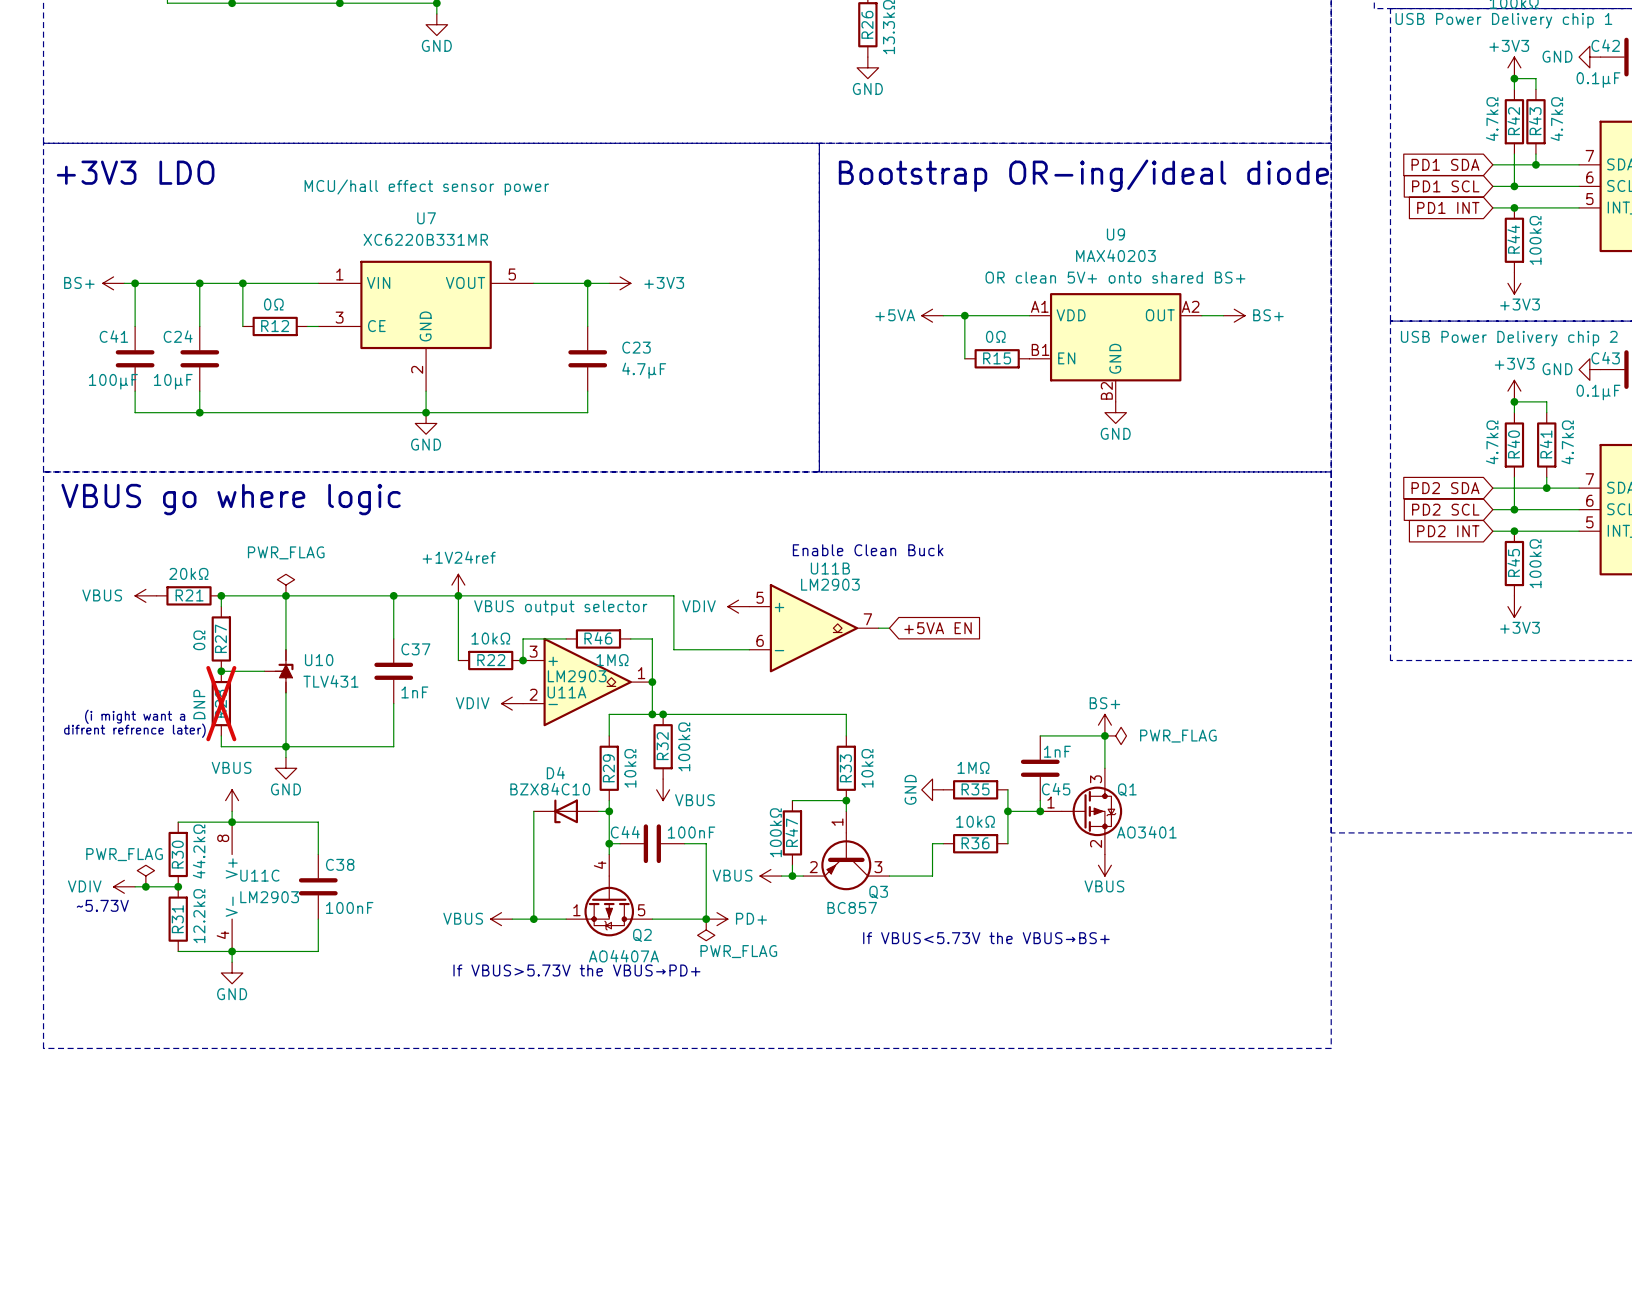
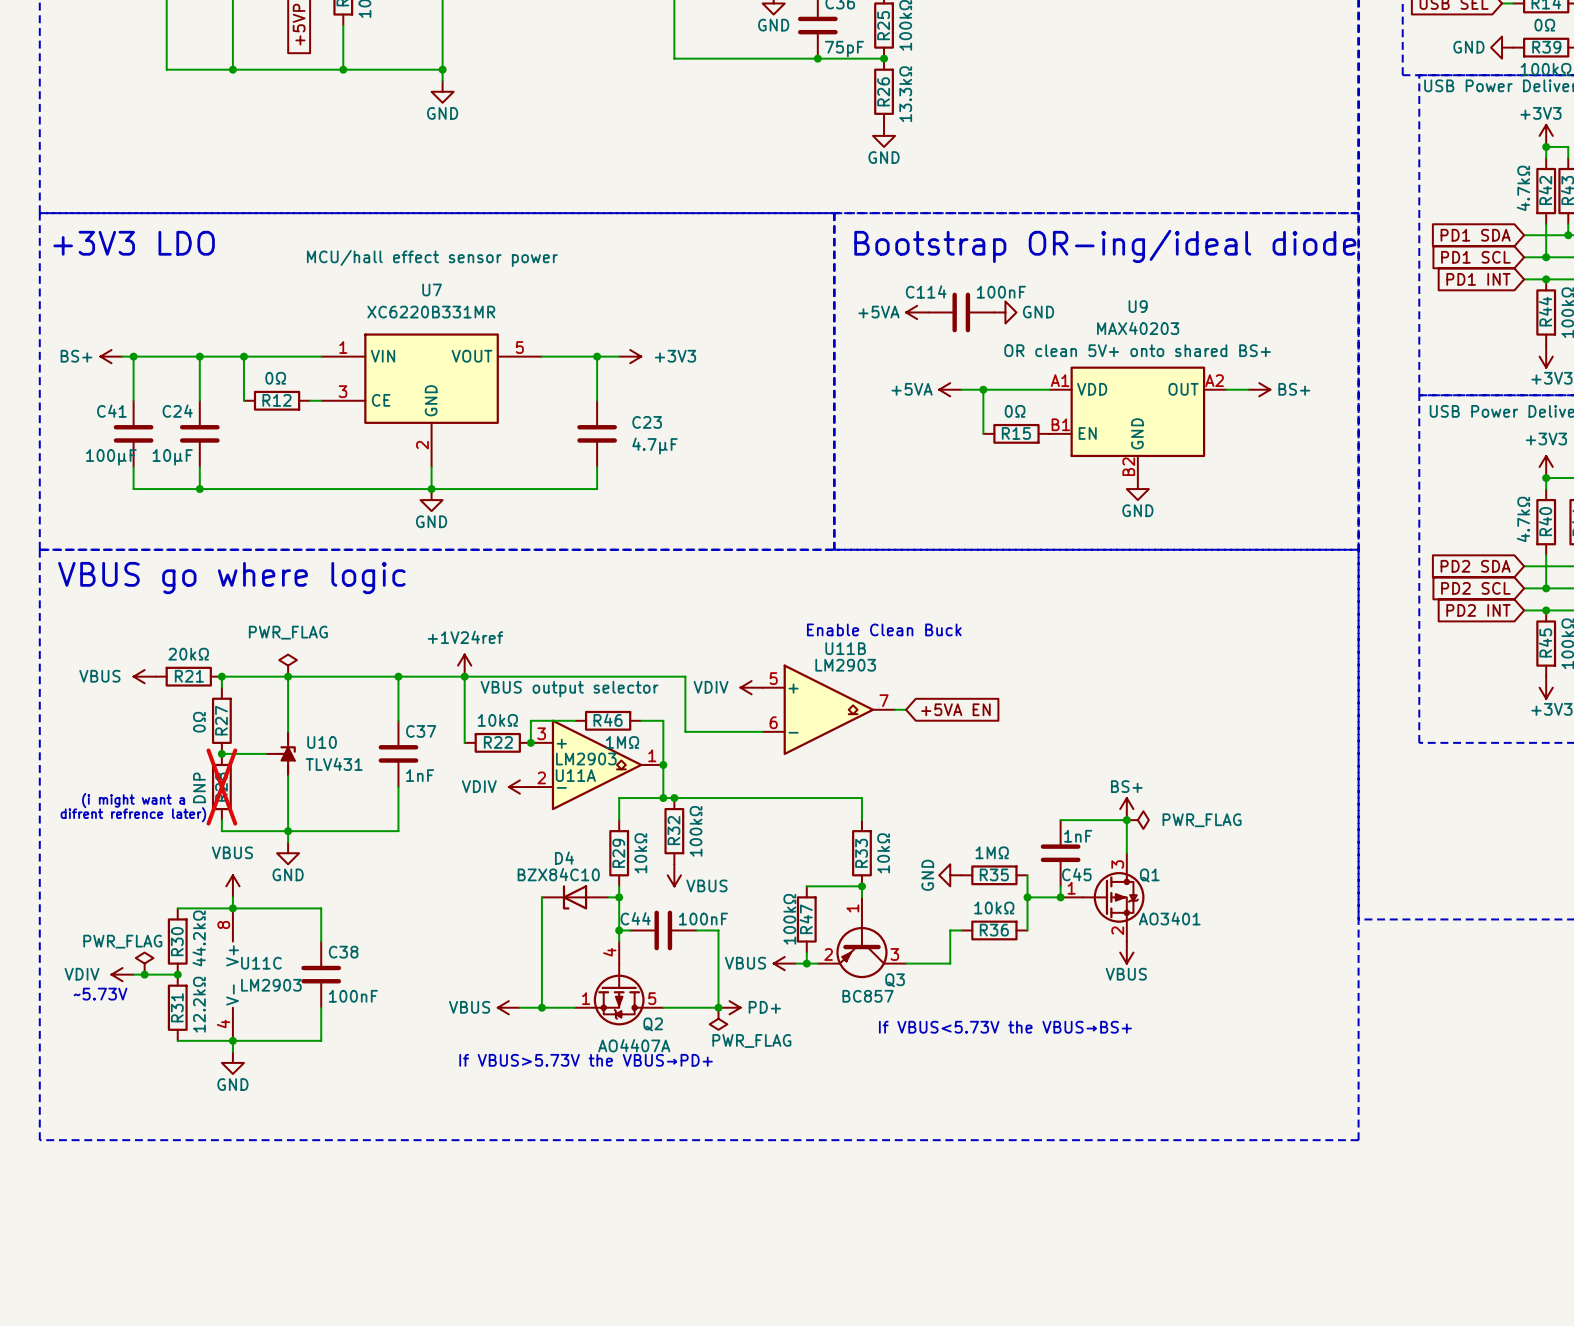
power symbol: none -> +5VA (917, 312)
C114: none -> 100nF (961, 312)
power symbol: none -> GND (1005, 312)

